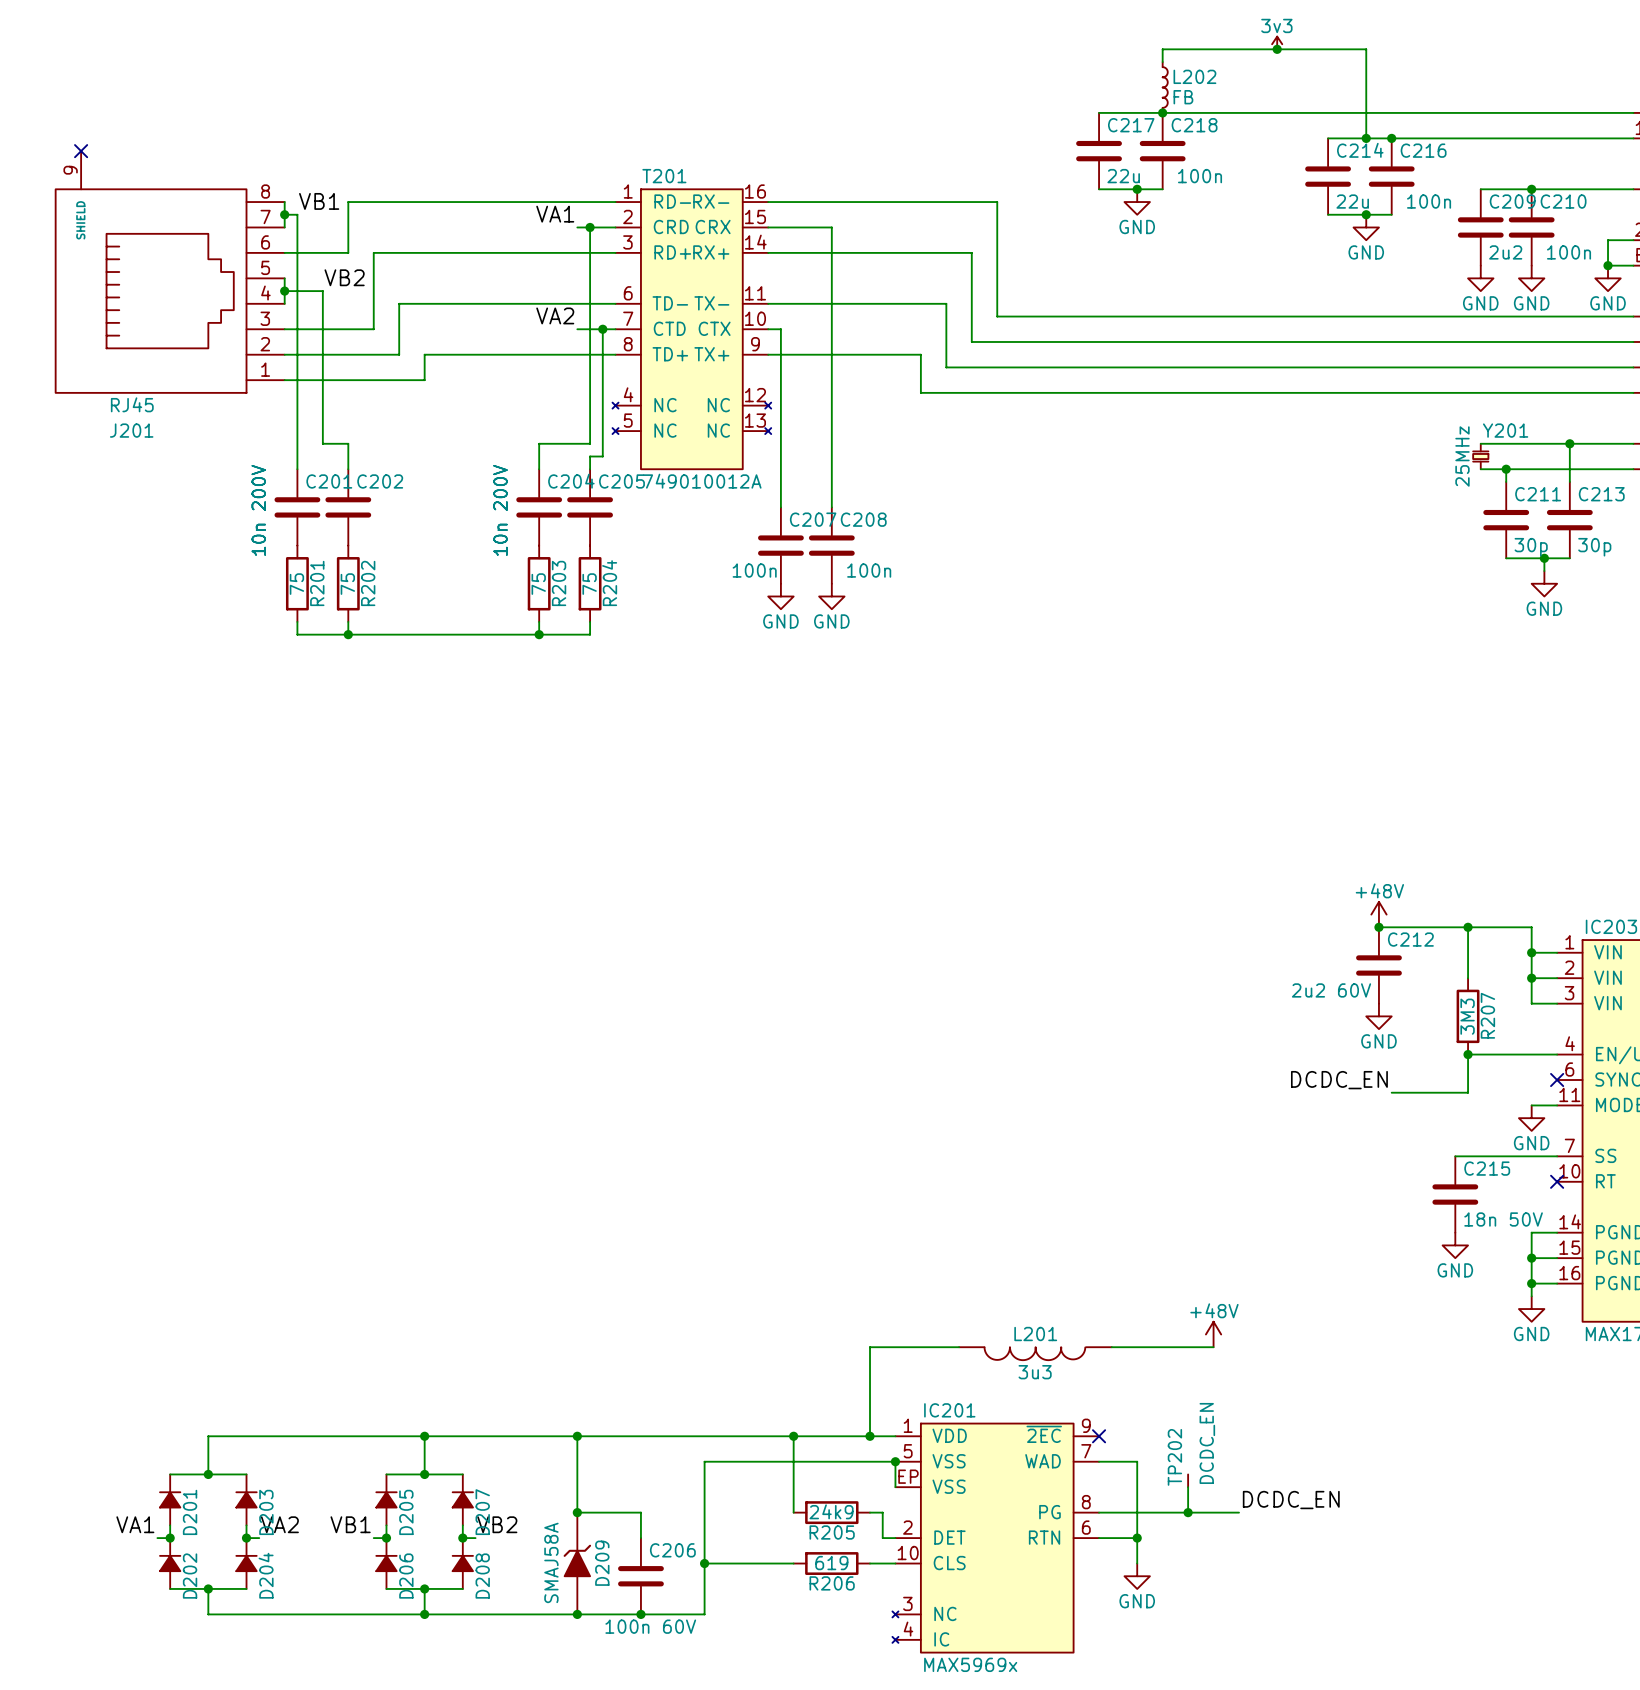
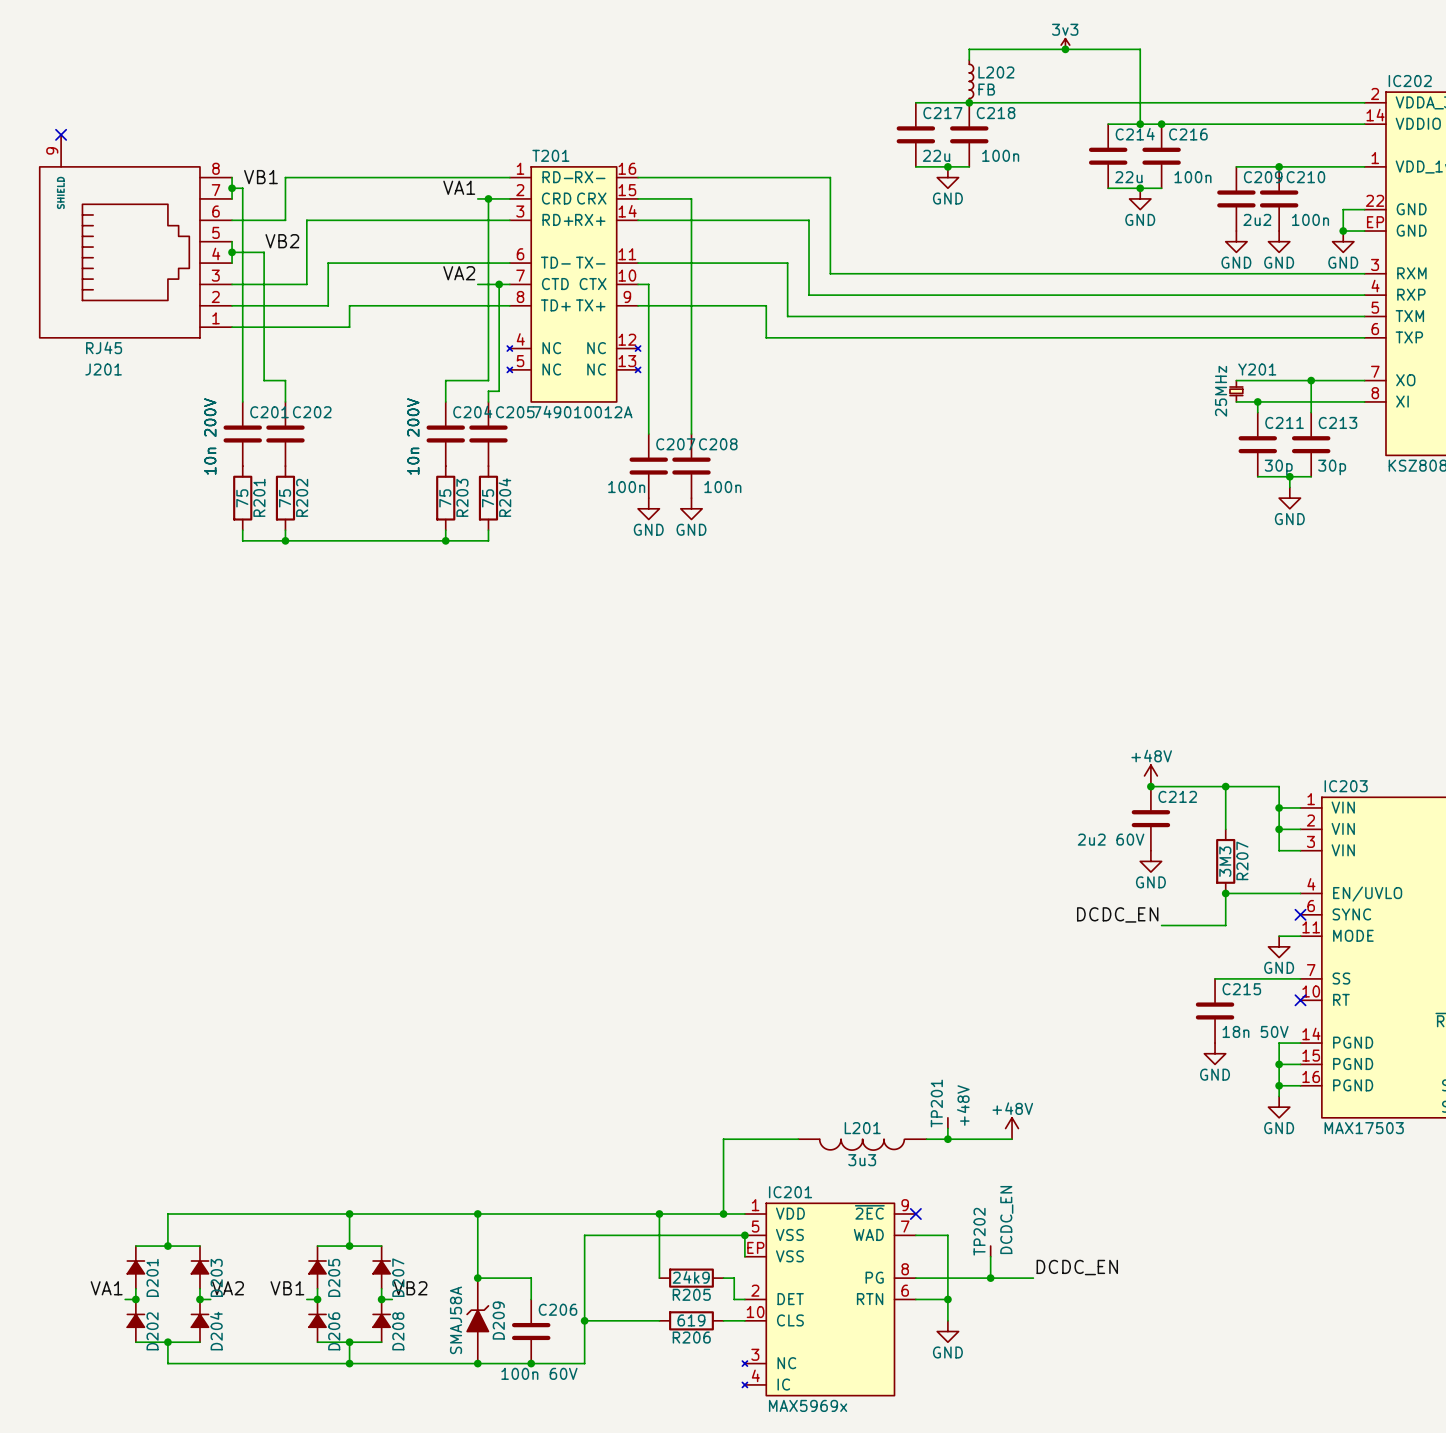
TP201: none -> +48V (947, 1120)
wire: none -> (947, 1128) (947, 1139)
junction: none -> (947, 1139)

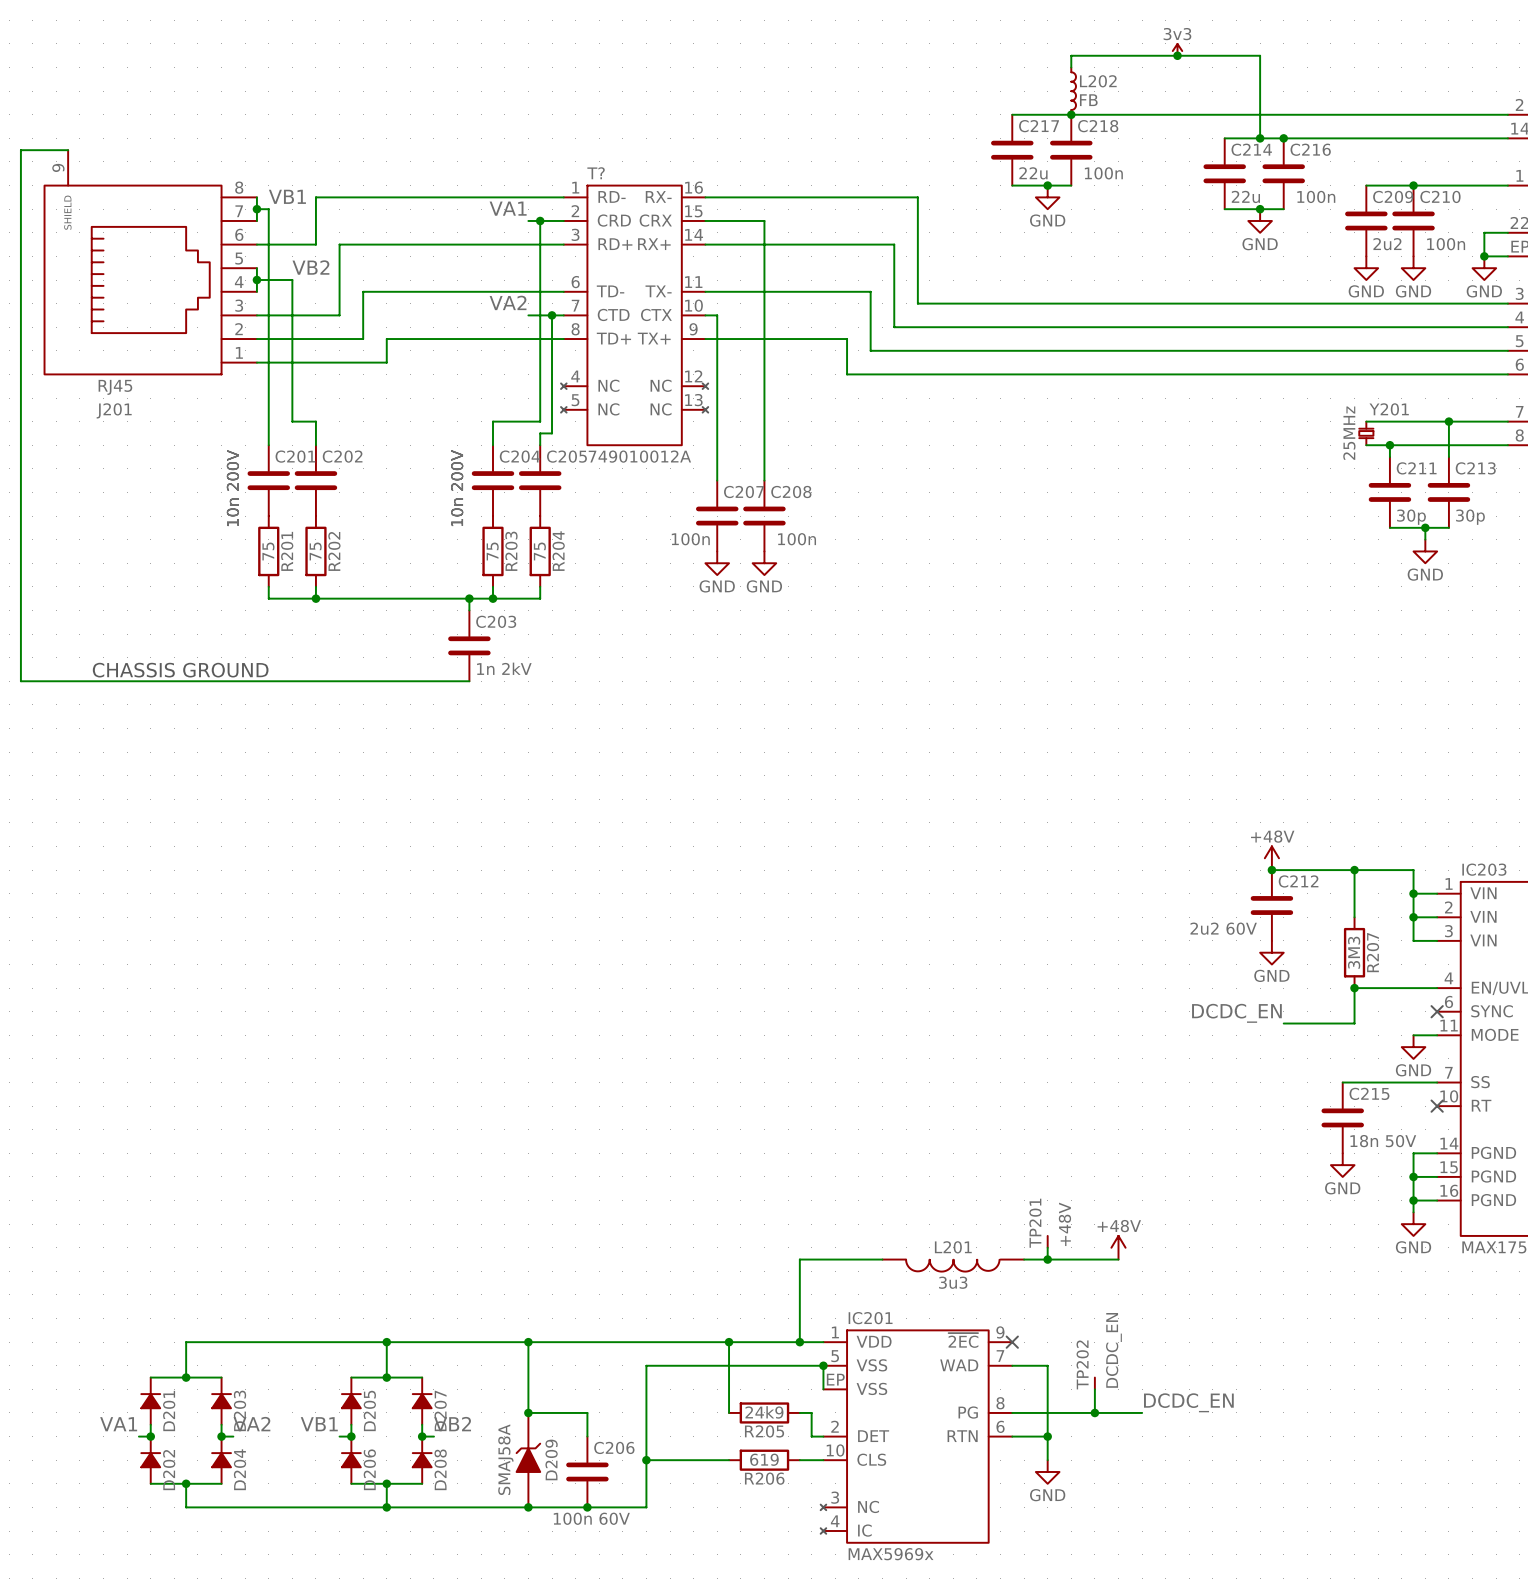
wire: none -> (68, 150) (20, 150) (20, 681) (469, 681)
no-connect mark: (61, 134) -> none
T201 name: T201 (550, 155) -> T? (596, 173)
wire: none -> (469, 598) (469, 610)
junction: none -> (469, 598)
C203: none -> 1n 2kV (469, 645)
text: none -> CHASSIS GROUND (180, 670)

